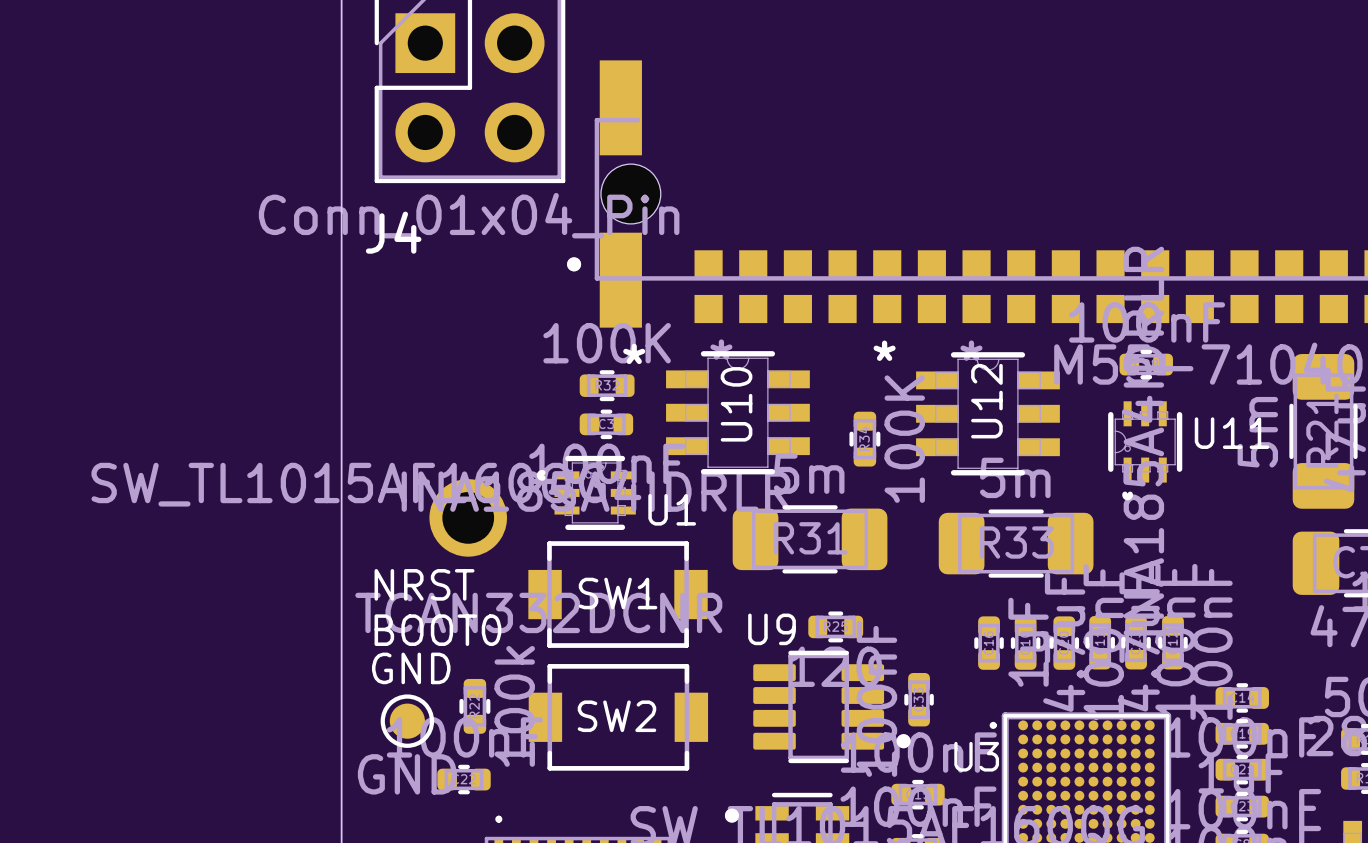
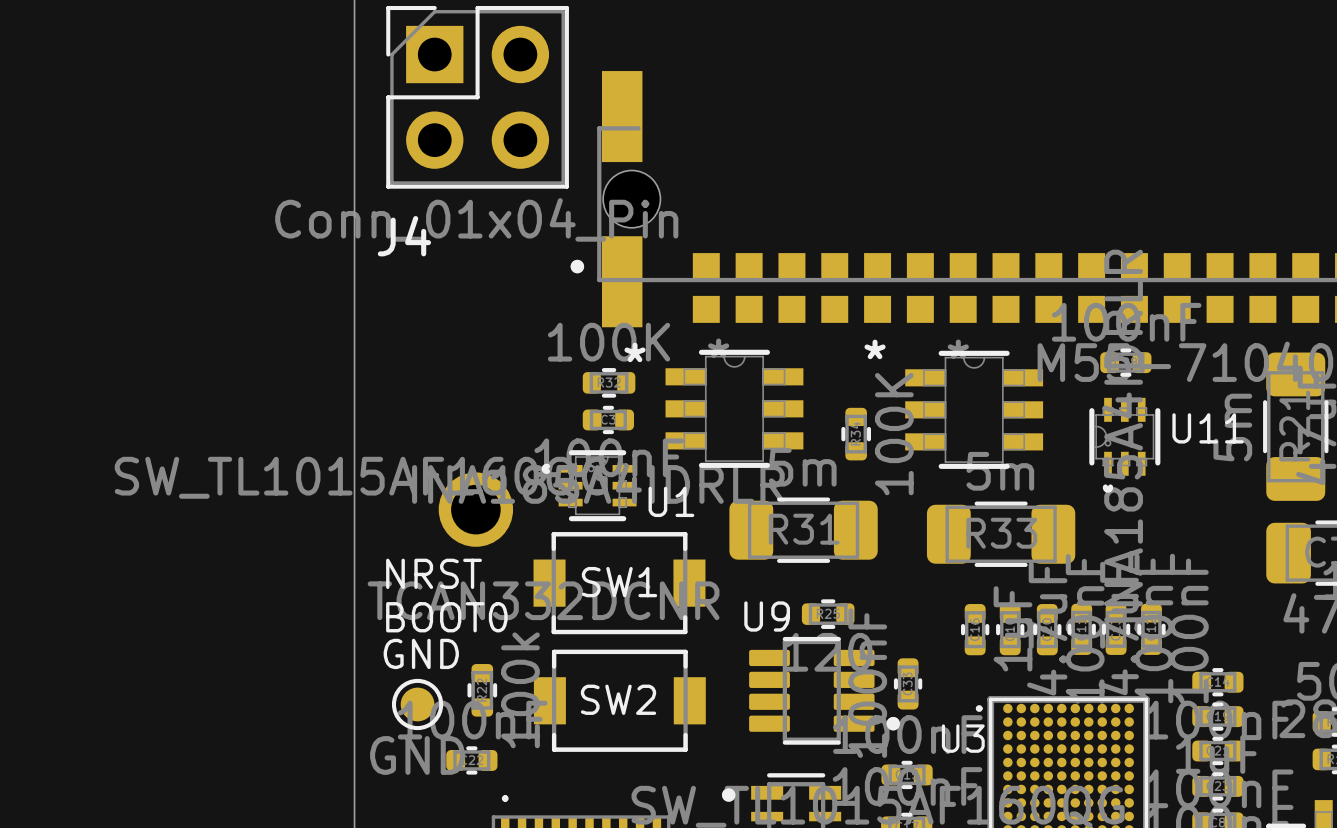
U12 name: U12 (986, 401) -> none
U10 name: U10 (736, 404) -> none

